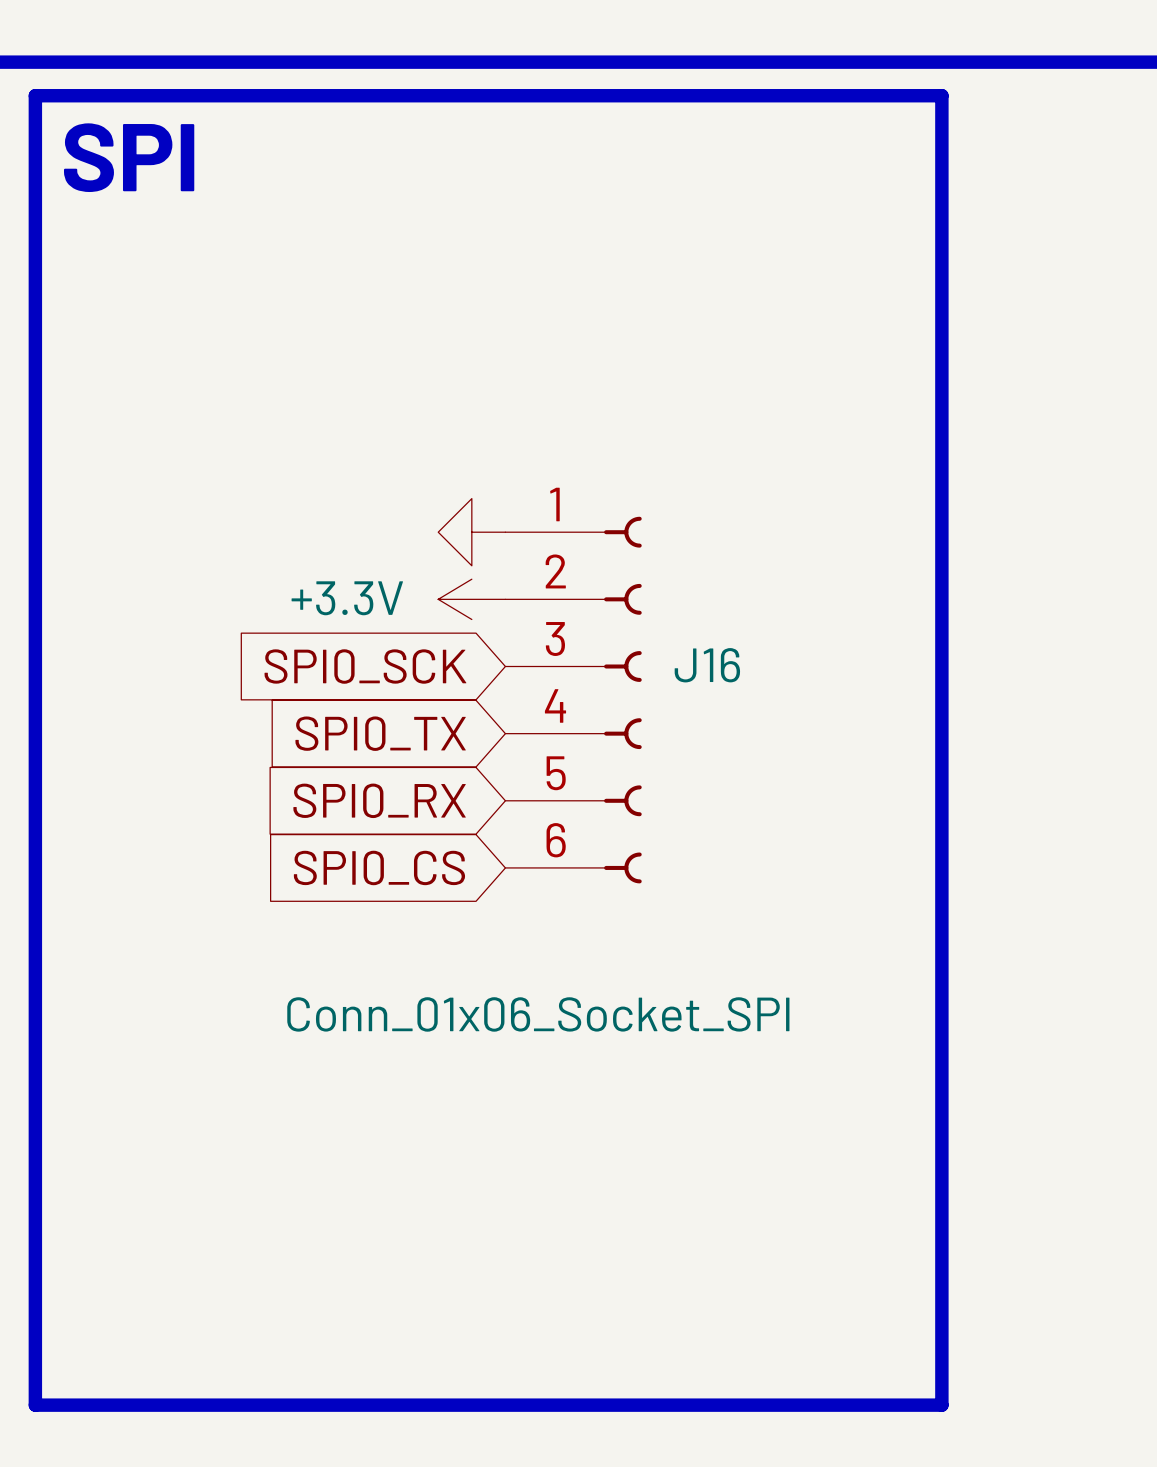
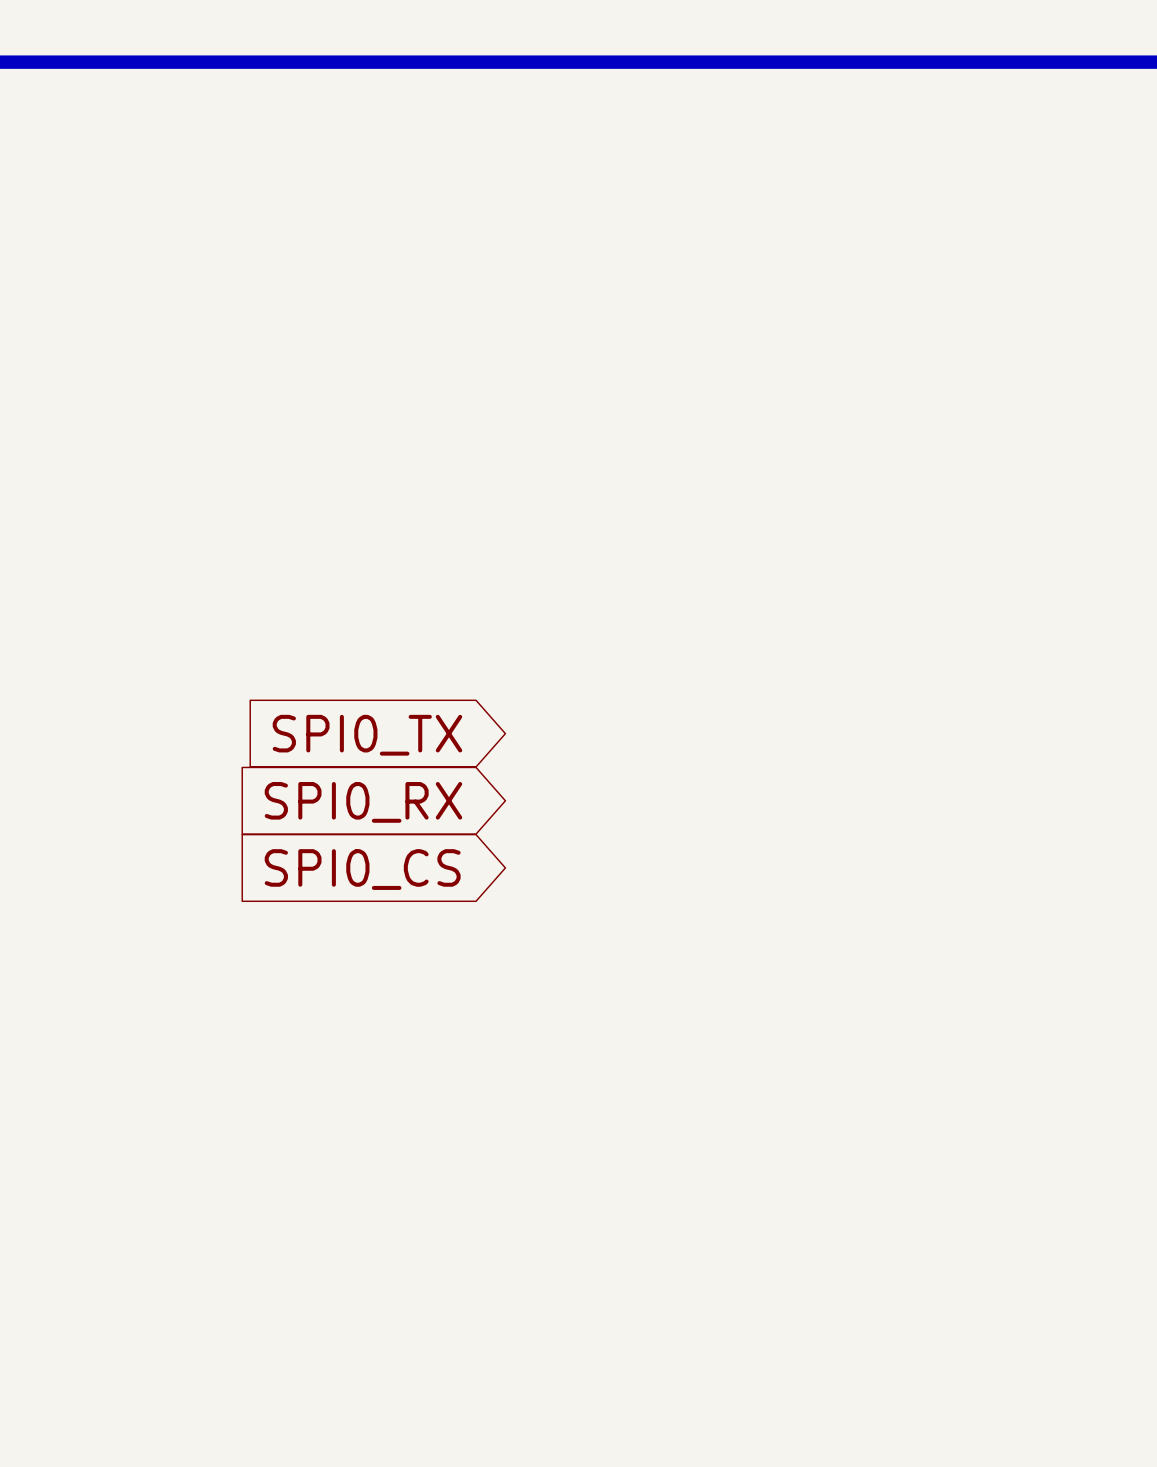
line: (35, 95) (941, 95) (941, 1405) (35, 1405) (35, 95) -> none
text: SPI (129, 157) -> none
power symbol: (471, 532) -> none
power symbol: +3.3V (471, 599) -> none
global label: SPI0_SCK (365, 666) -> none
J16: Conn_01x06_Socket_SPI (573, 700) -> none

